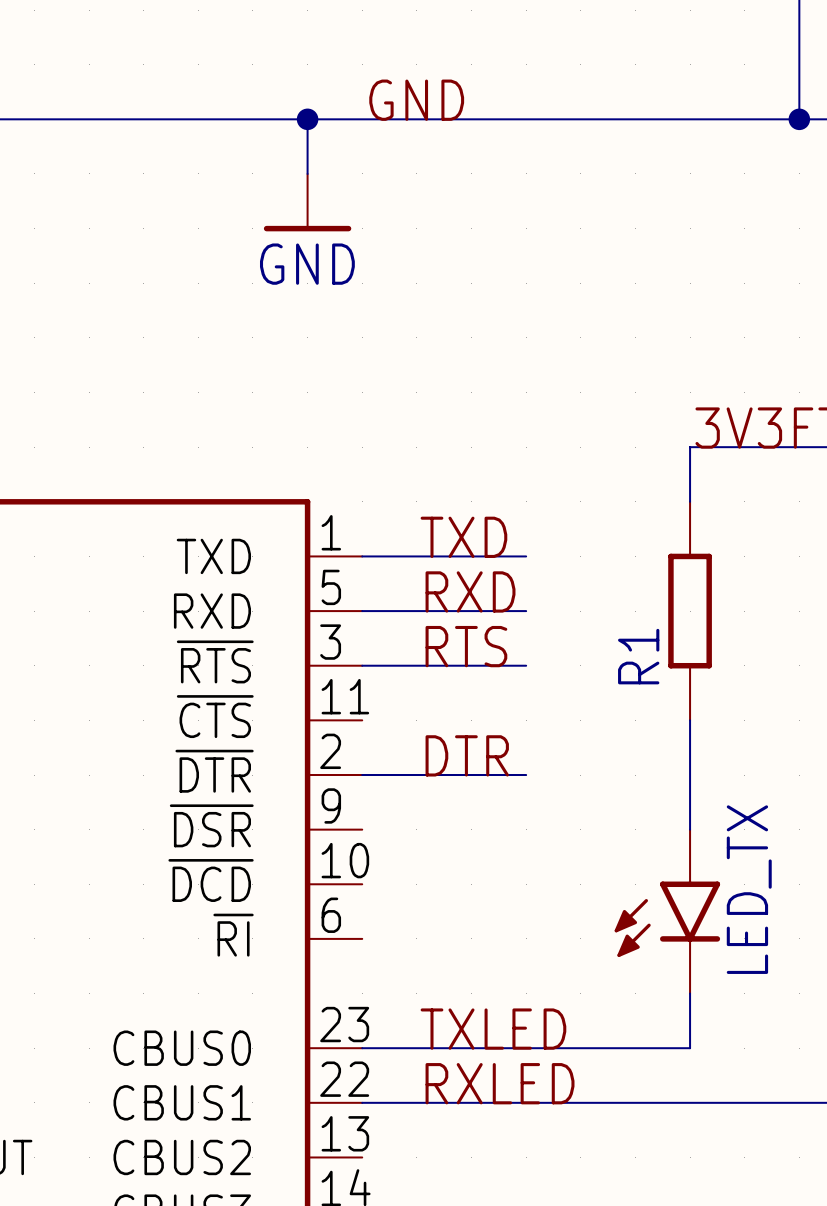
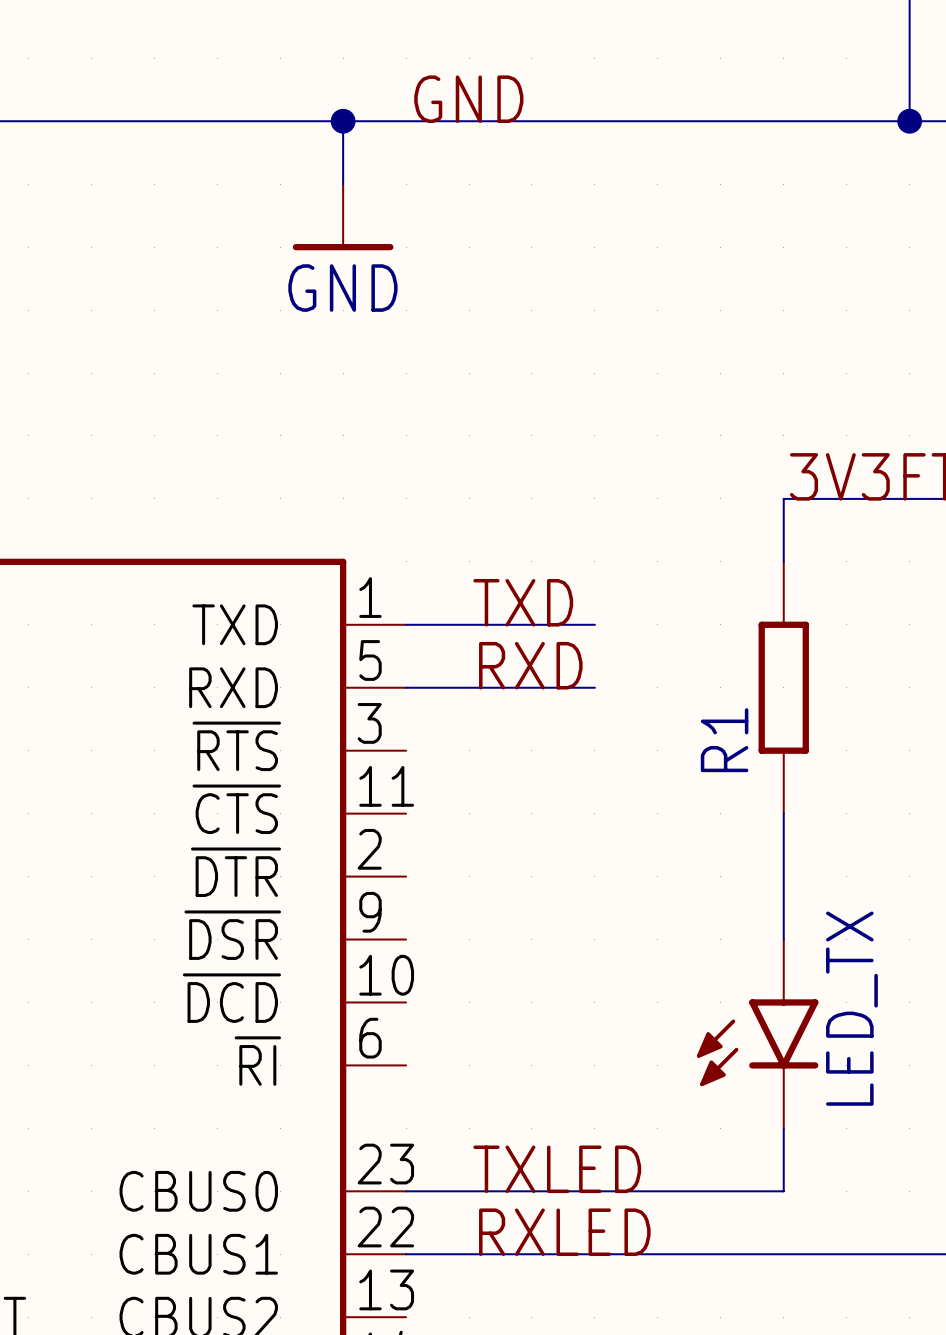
label: RTS (466, 646) -> none
wire: (362, 665) (526, 665) -> none
label: DTR (467, 755) -> none
wire: (362, 775) (526, 775) -> none

